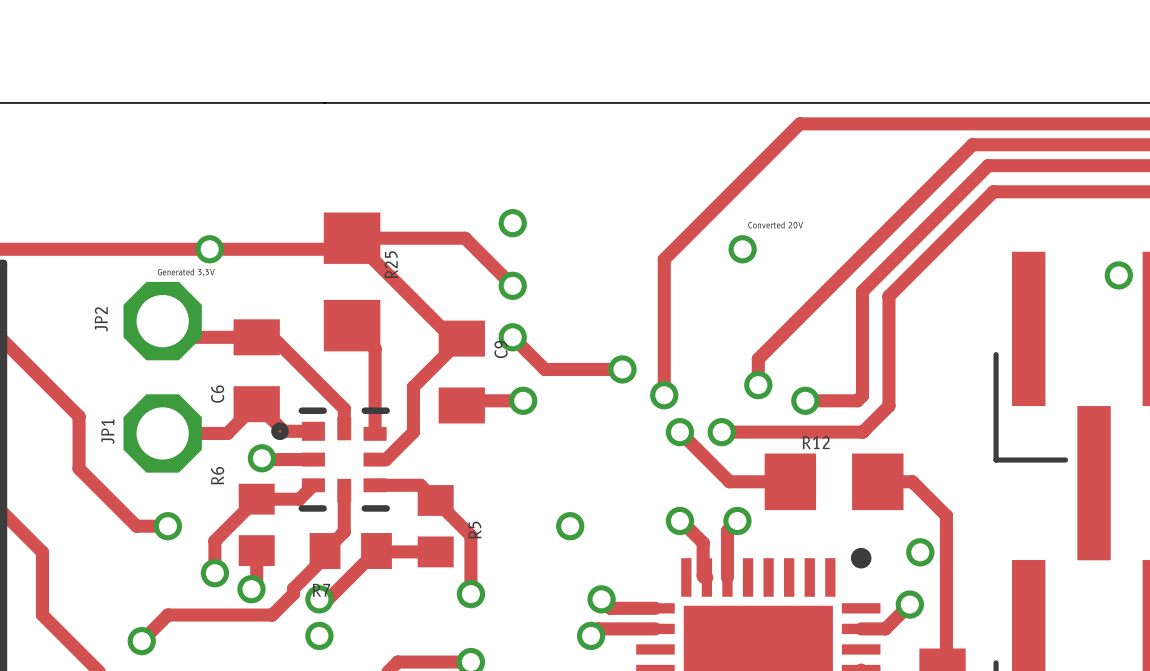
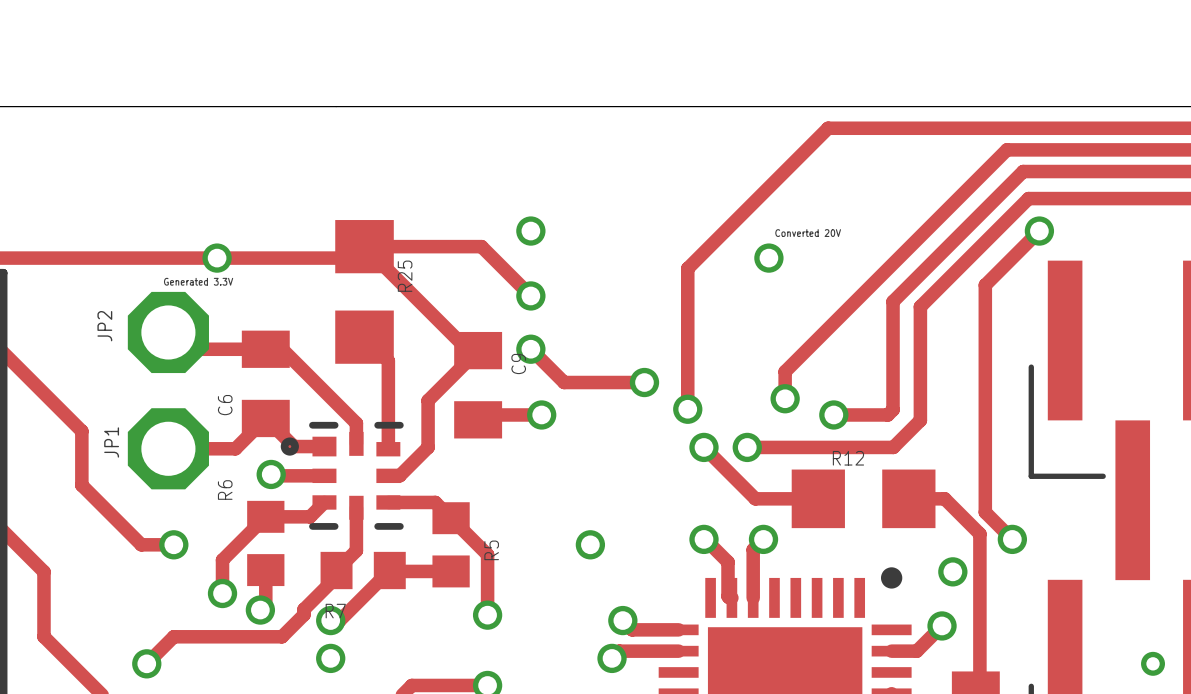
track: none -> (1039, 231) (985, 285) (985, 512) (1012, 539)
via position: (1118, 275) -> (1039, 231)
via: none -> (1012, 539)
via: none -> (1153, 663)

